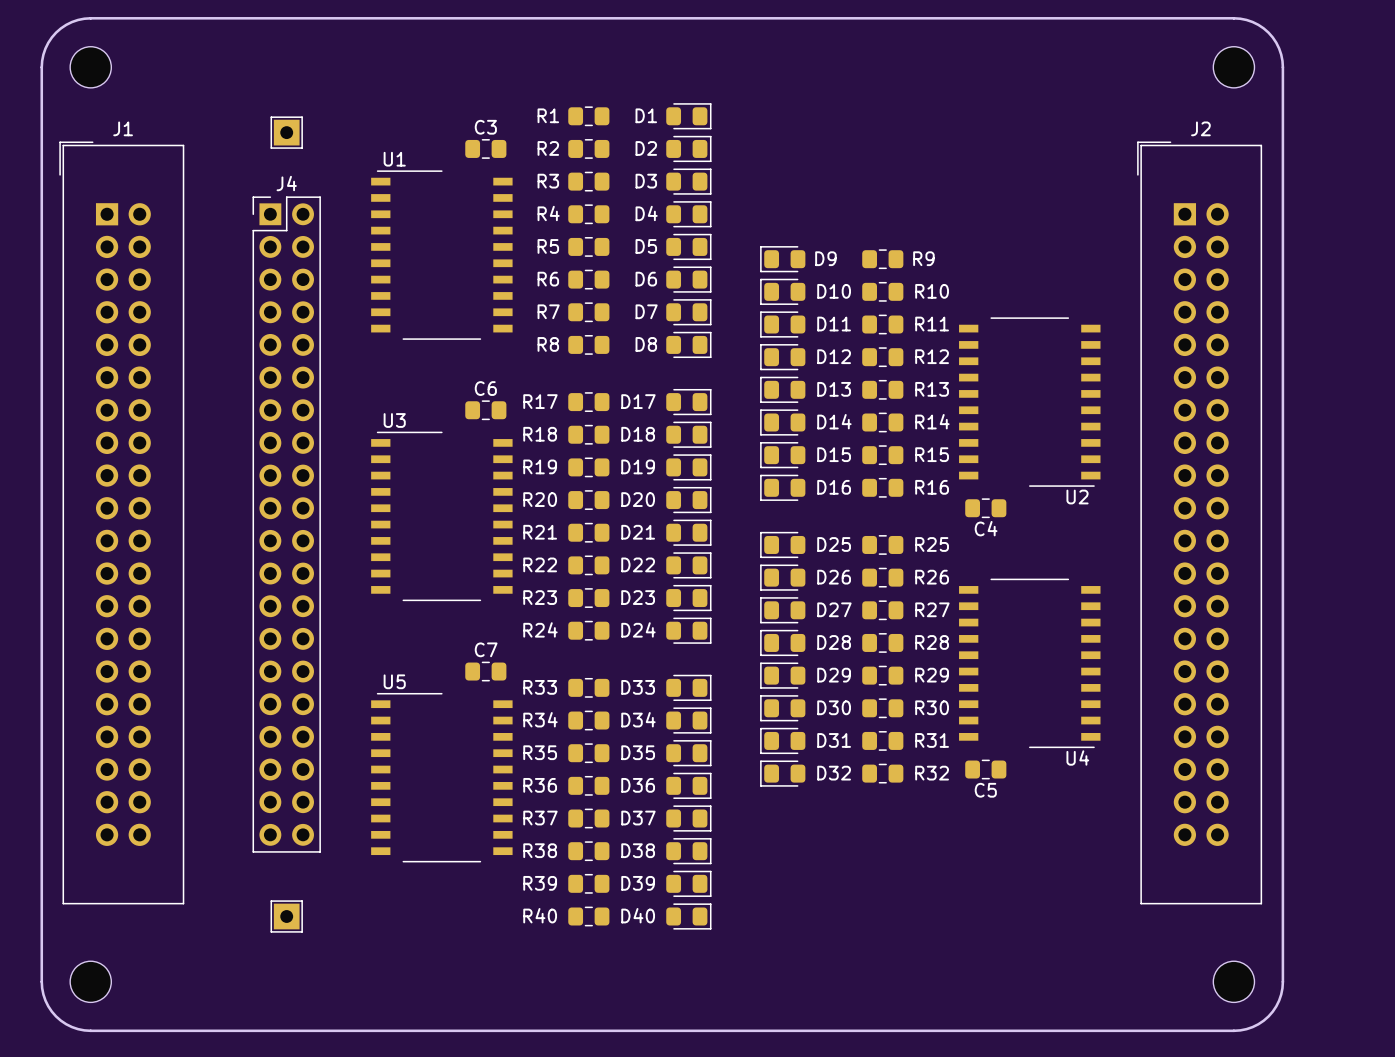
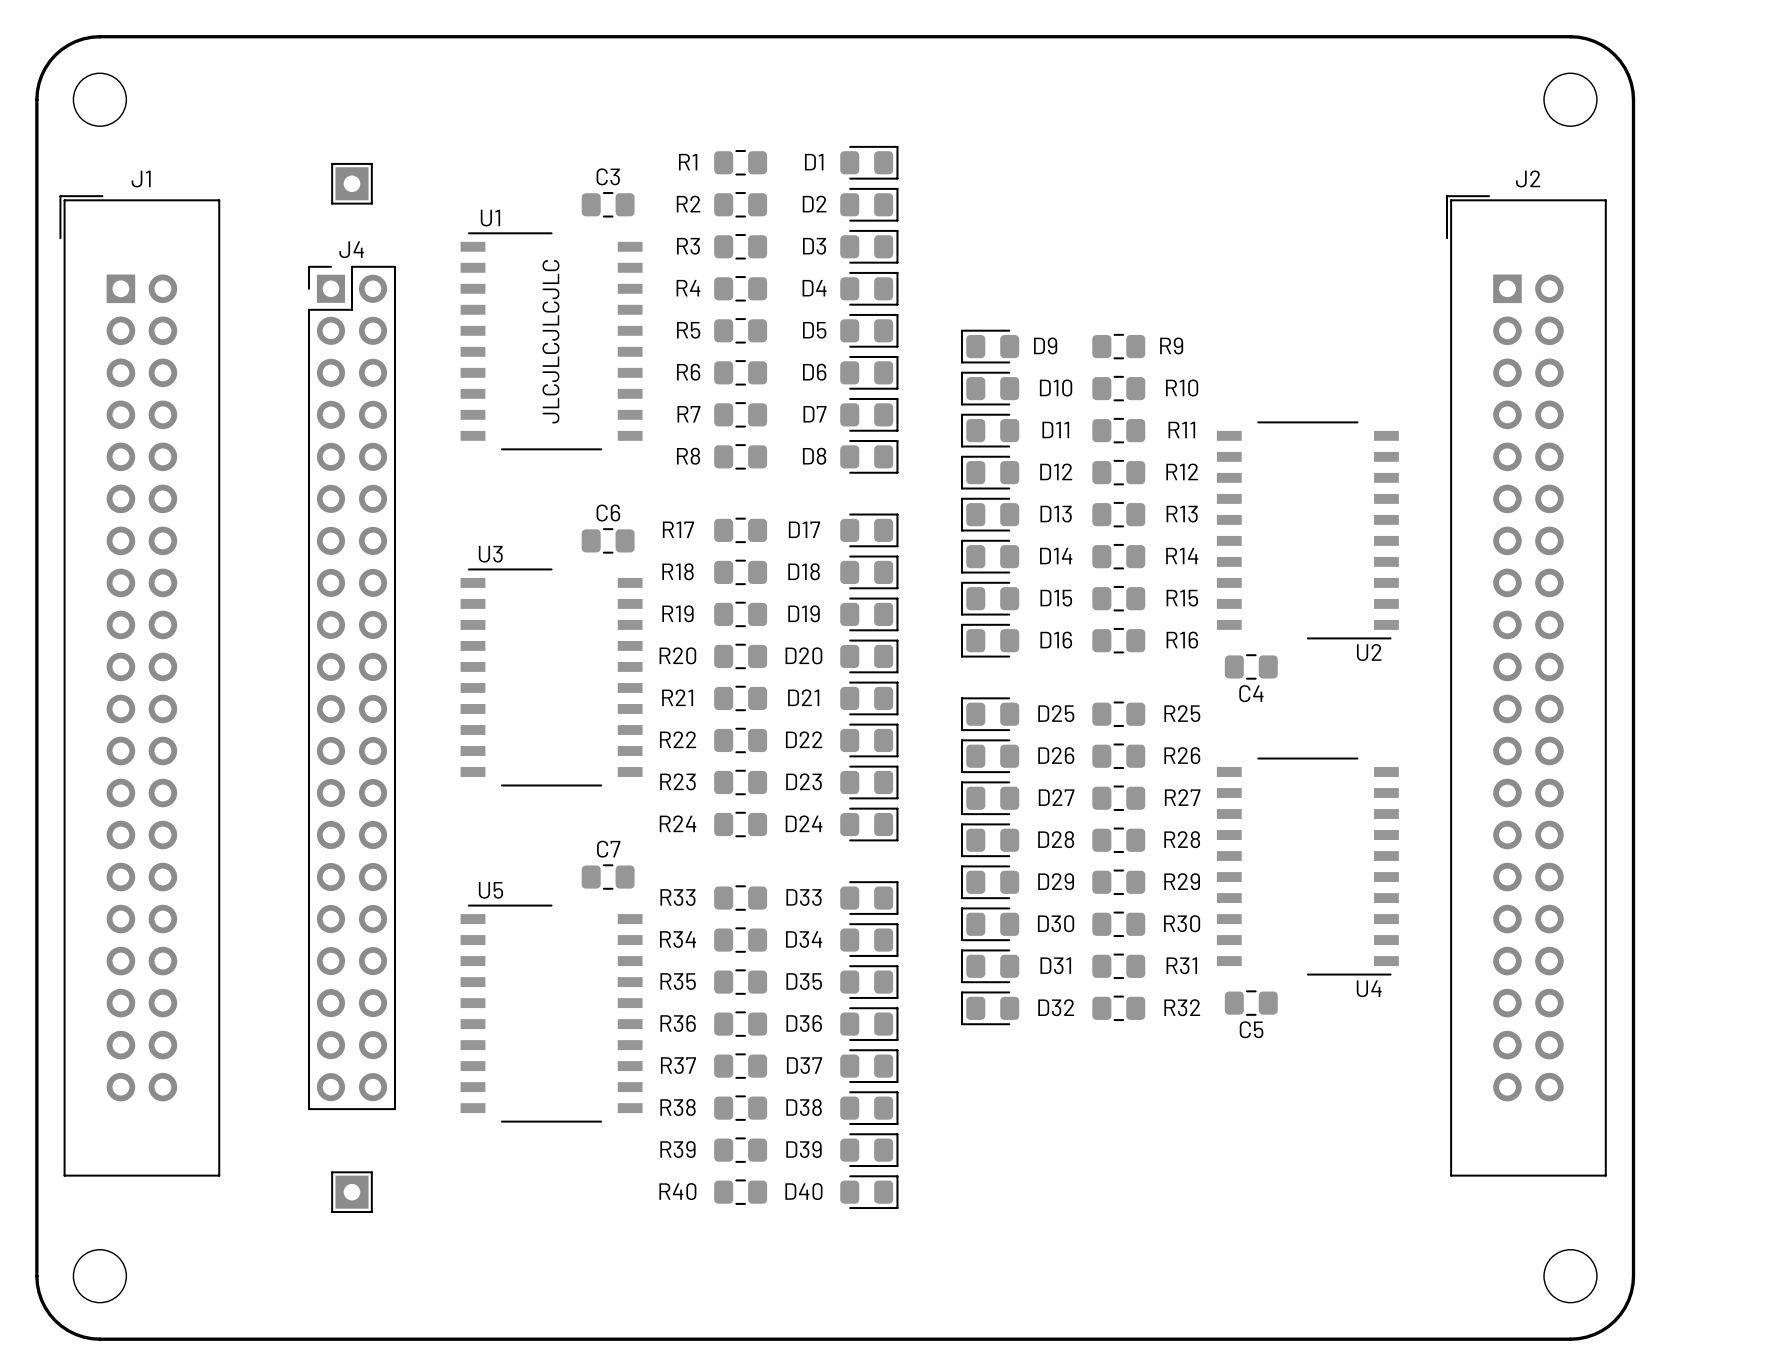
text: none -> JLCJLCJLCJLC (550, 341)

